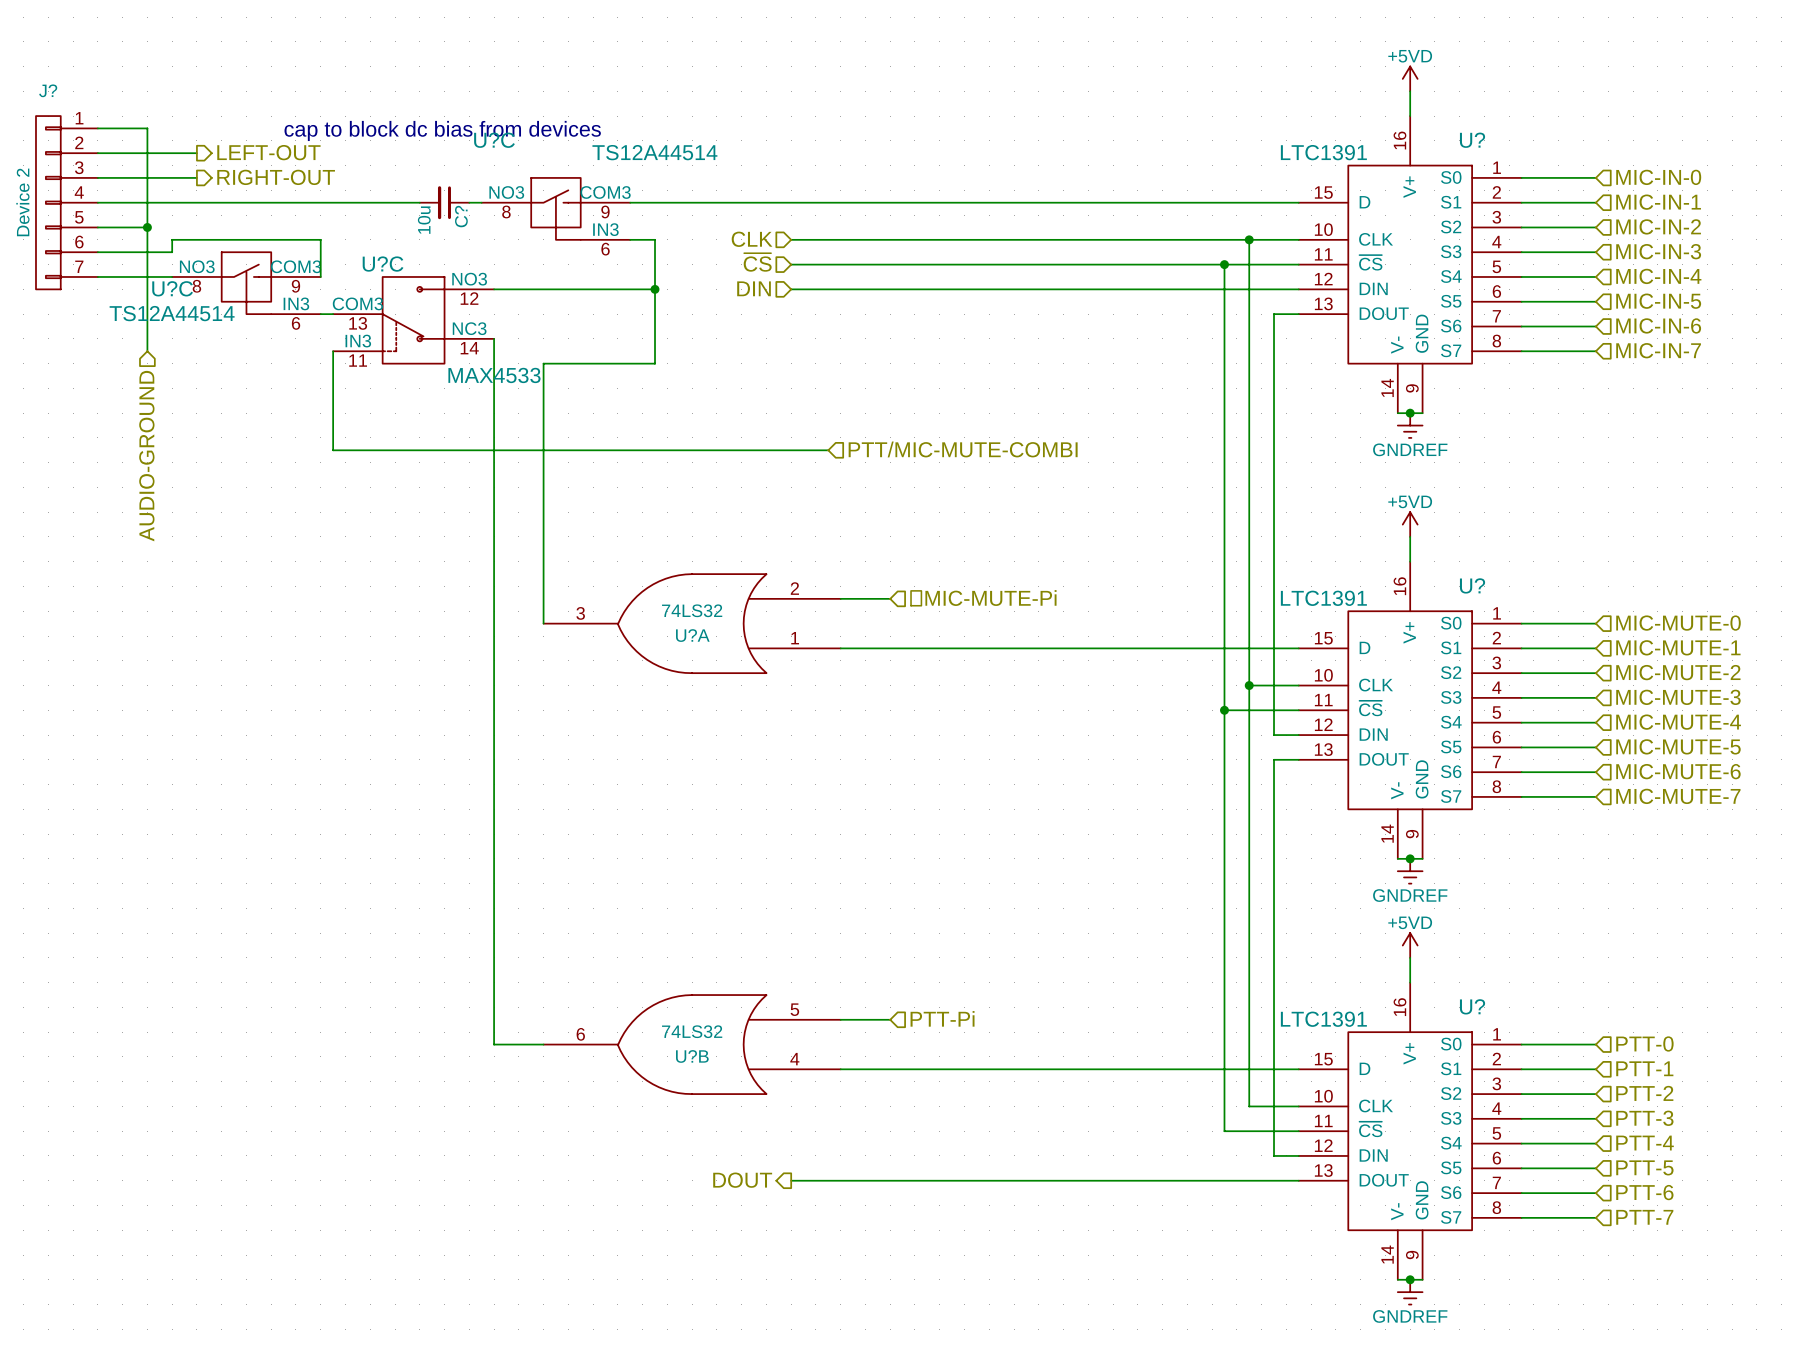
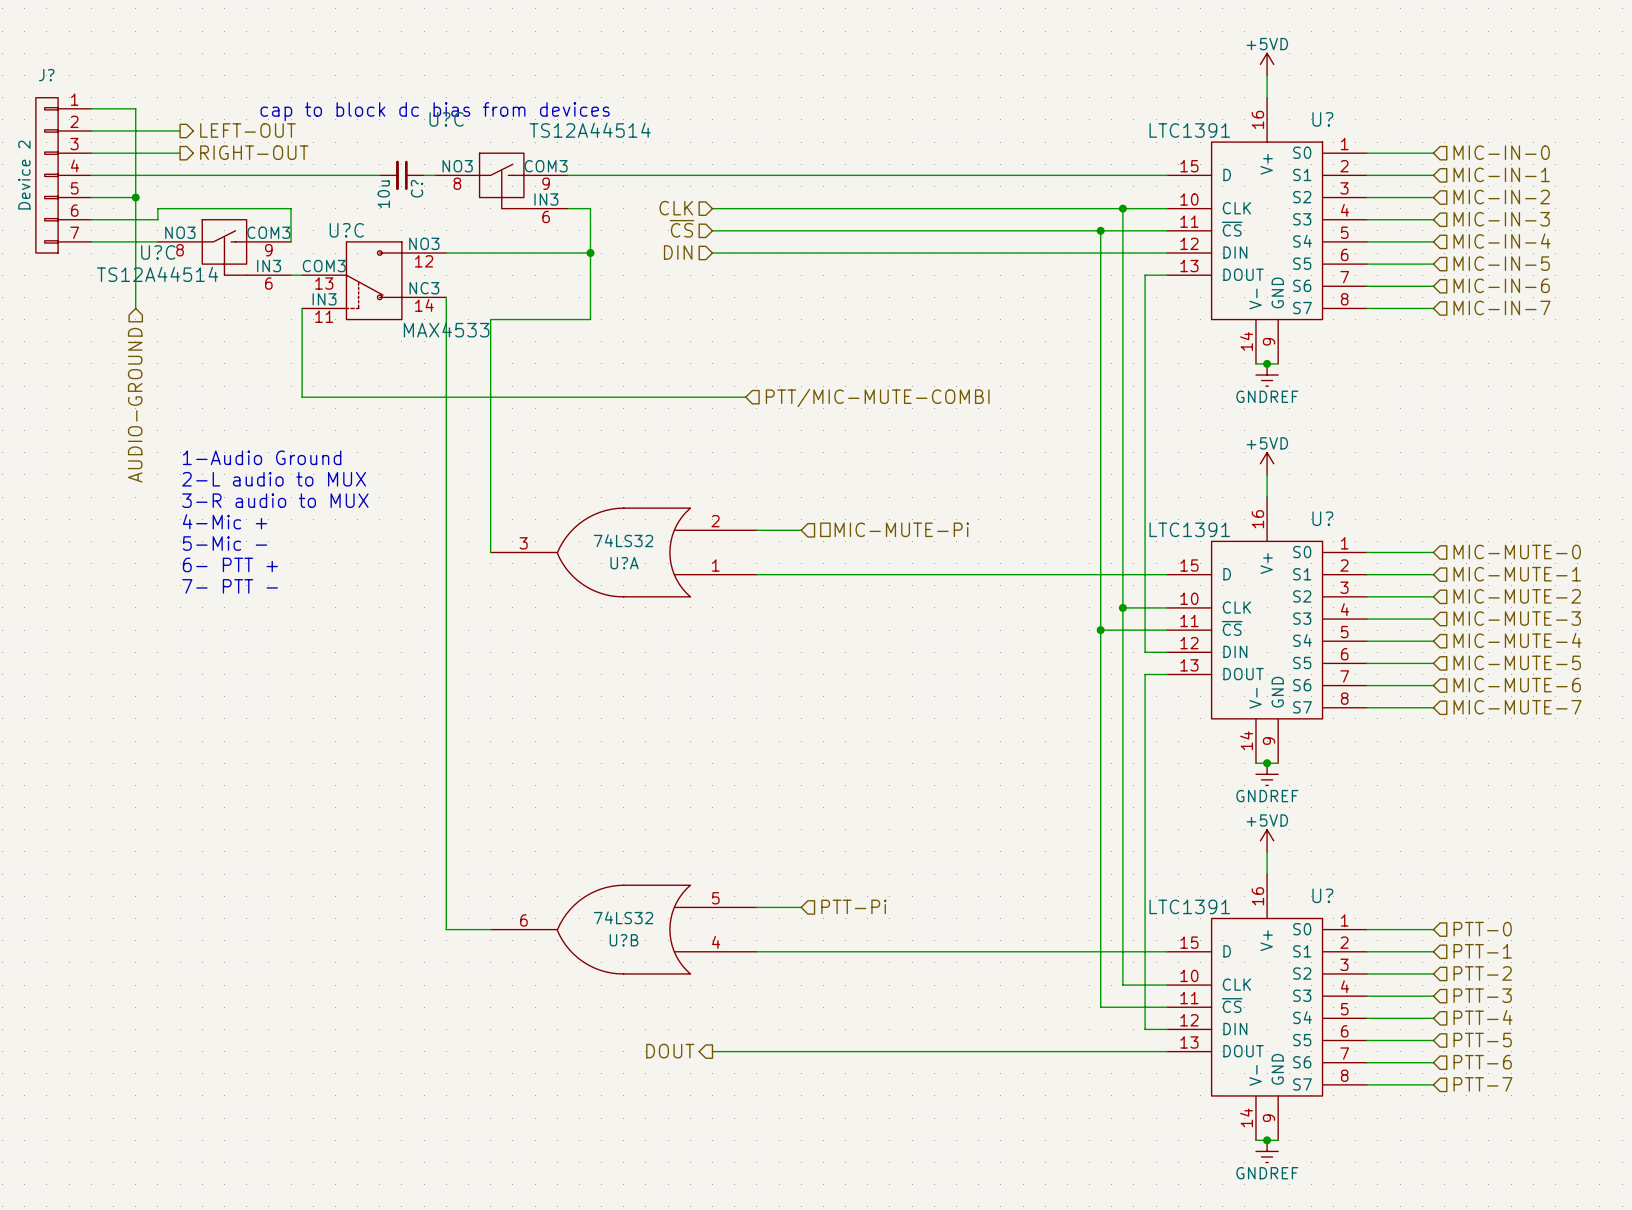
text: none -> 1-Audio Ground (262, 457)
text: none -> 2-L audio to MUX (274, 479)
text: none -> 3-R audio to MUX (275, 500)
text: none -> 4-Mic + (225, 521)
text: none -> 5-Mic - (225, 543)
text: none -> 6- PTT + (230, 564)
text: none -> 7- PTT - (230, 586)

